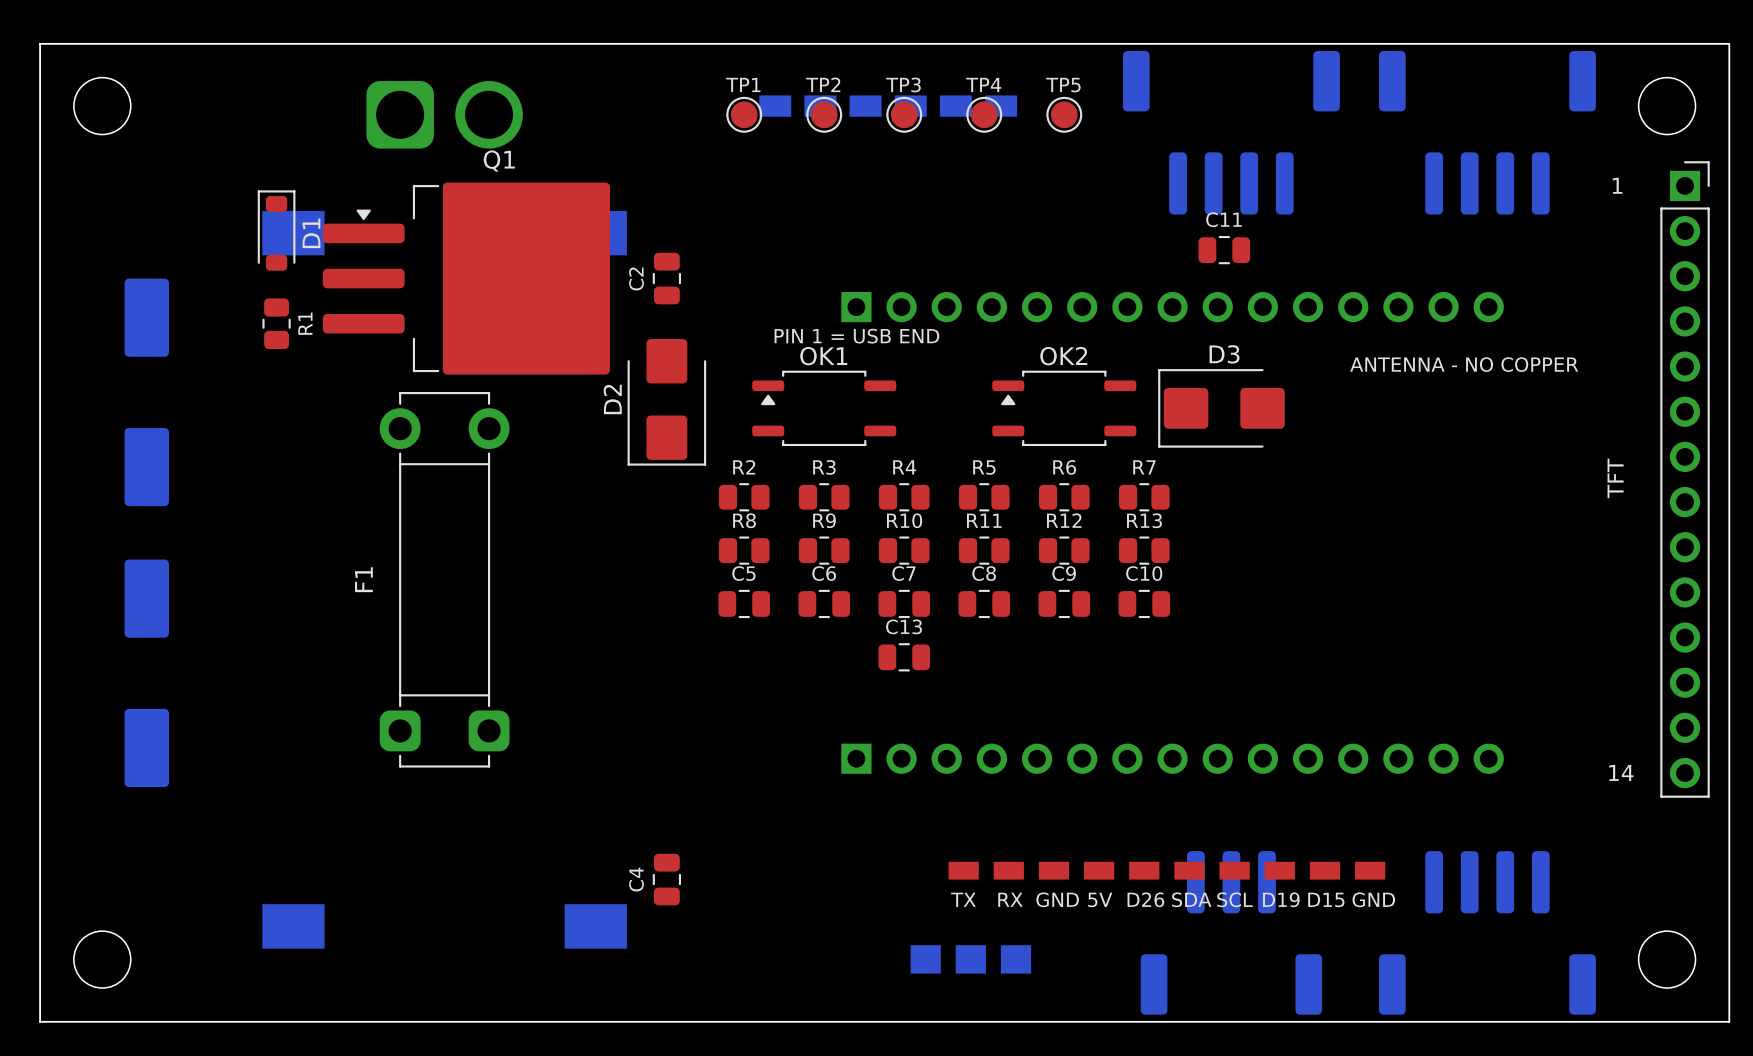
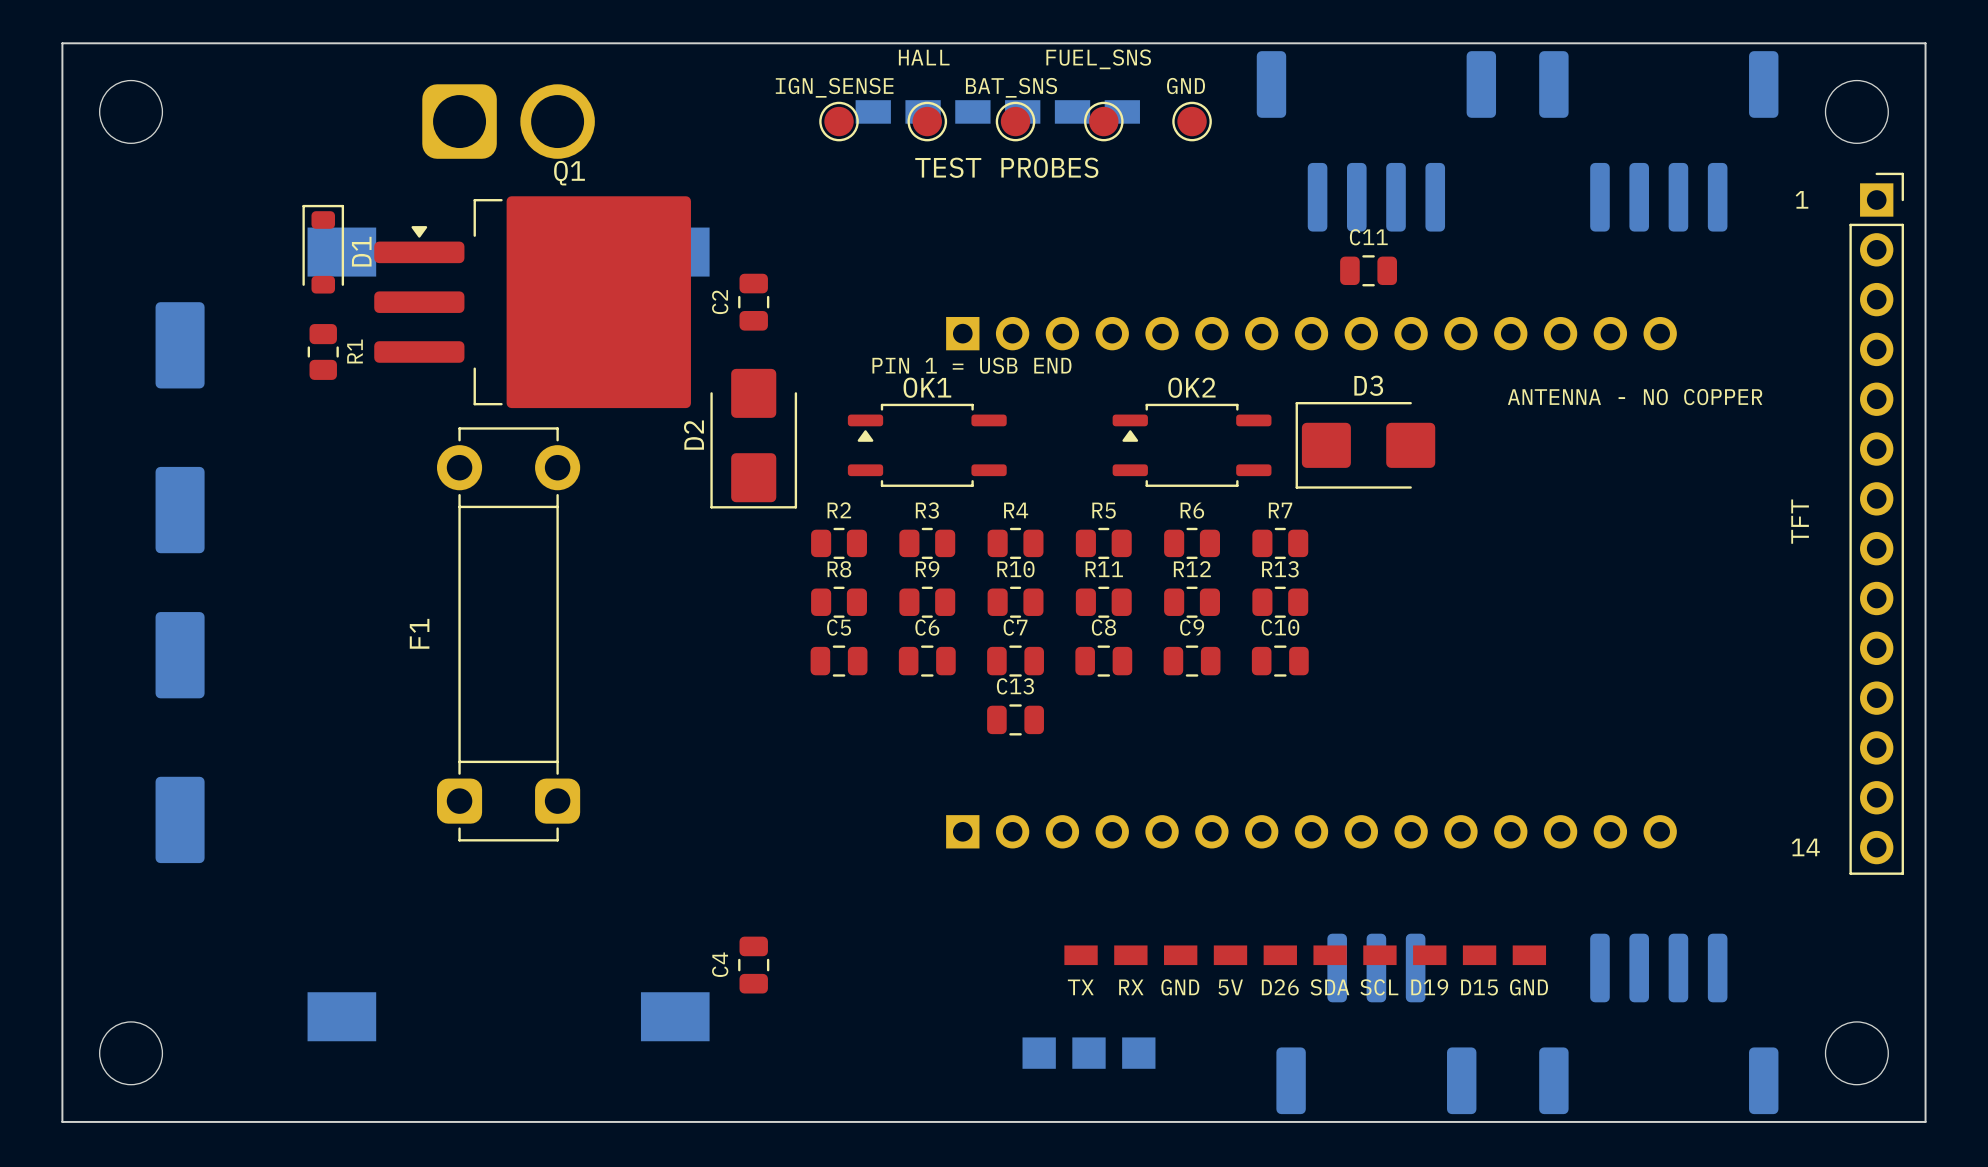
text: none -> HALL (924, 57)
text: none -> FUEL_SNS (1098, 59)
text: none -> GND (1186, 86)
text: none -> IGN_SENSE (834, 87)
TP1 name: TP1 (743, 84) -> none
TP2 name: TP2 (823, 84) -> none
text: none -> BAT_SNS (1011, 87)
TP3 name: TP3 (903, 84) -> none
TP4 name: TP4 (983, 84) -> none
TP5 name: TP5 (1063, 85) -> none
text: none -> TEST PROBES (1006, 167)

